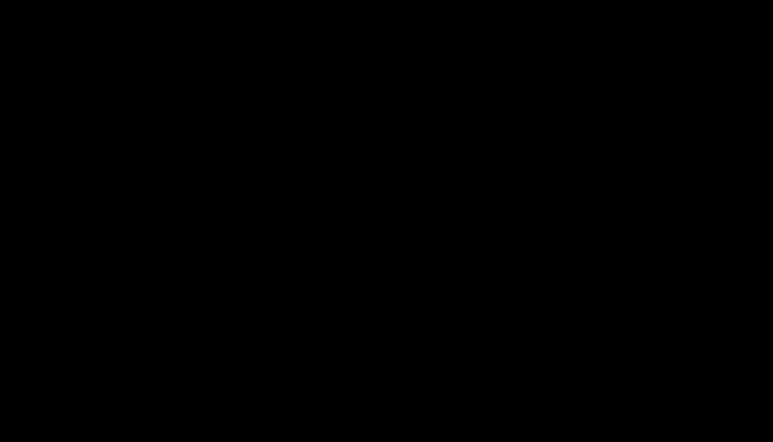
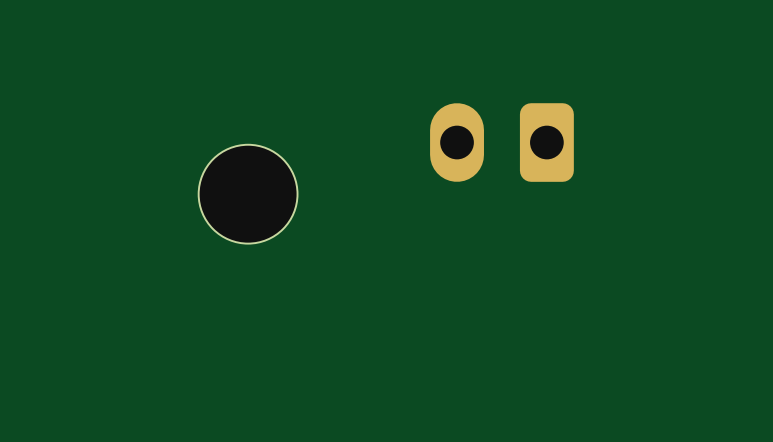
part: none -> (501, 142)
part: none -> (248, 194)

